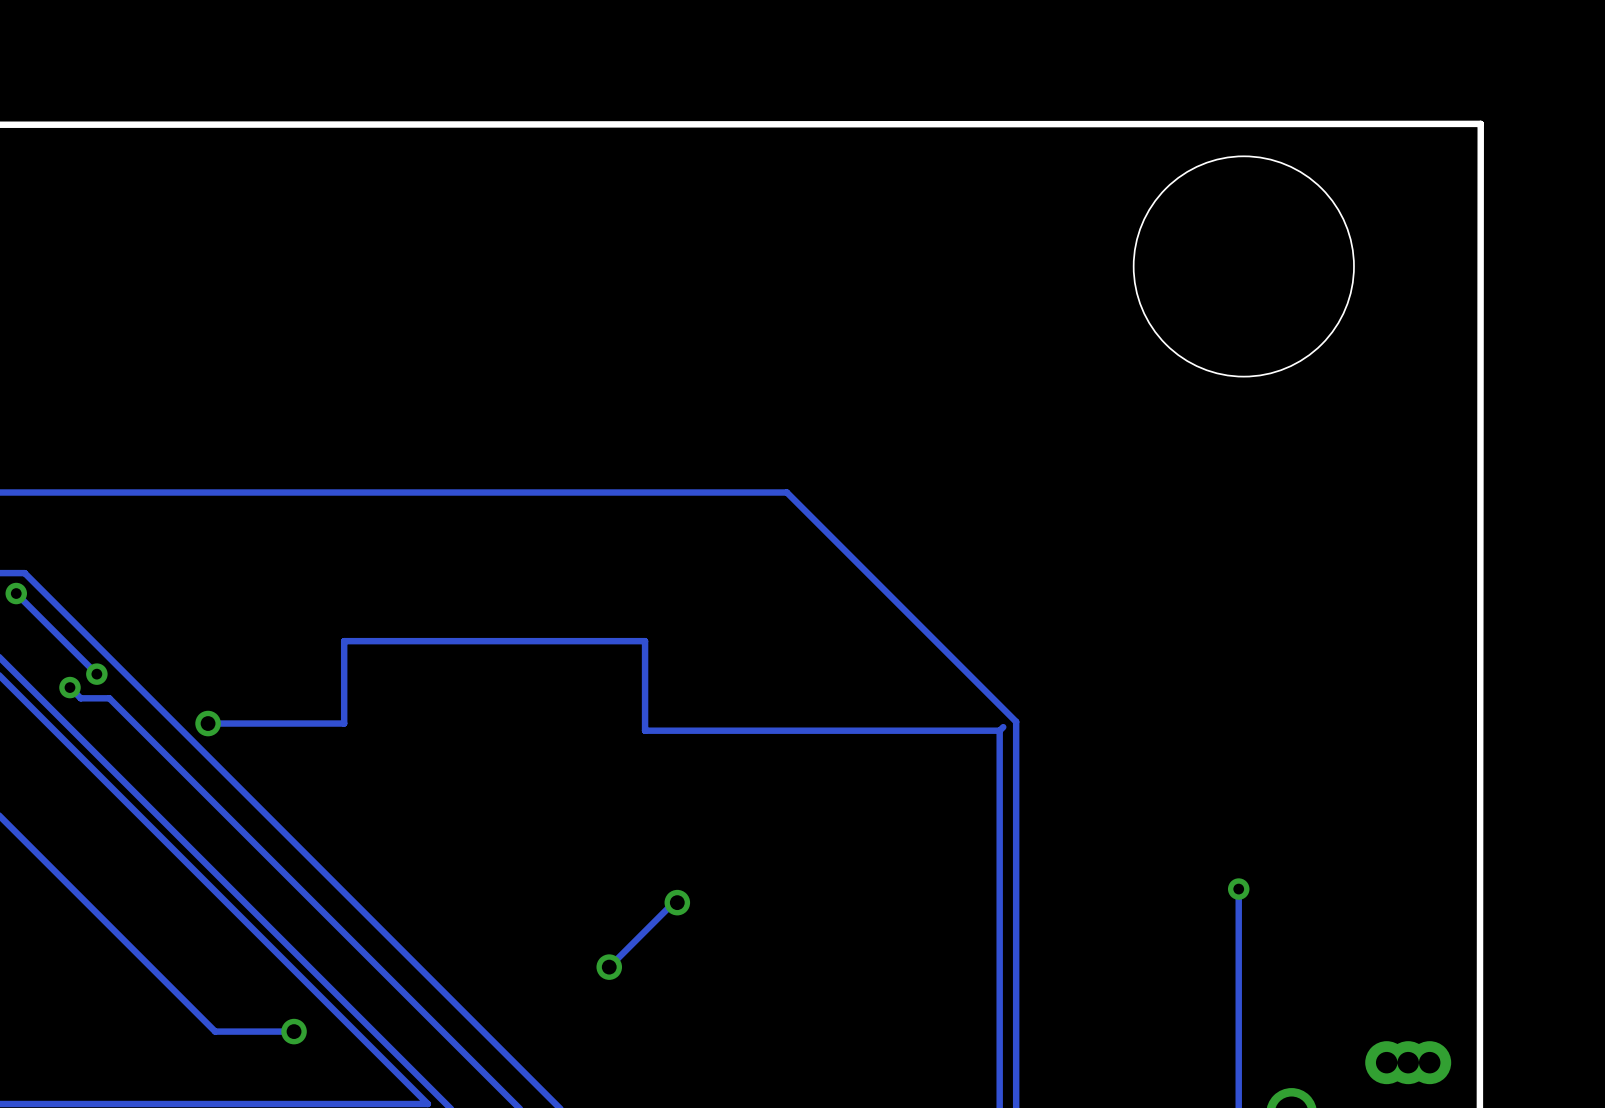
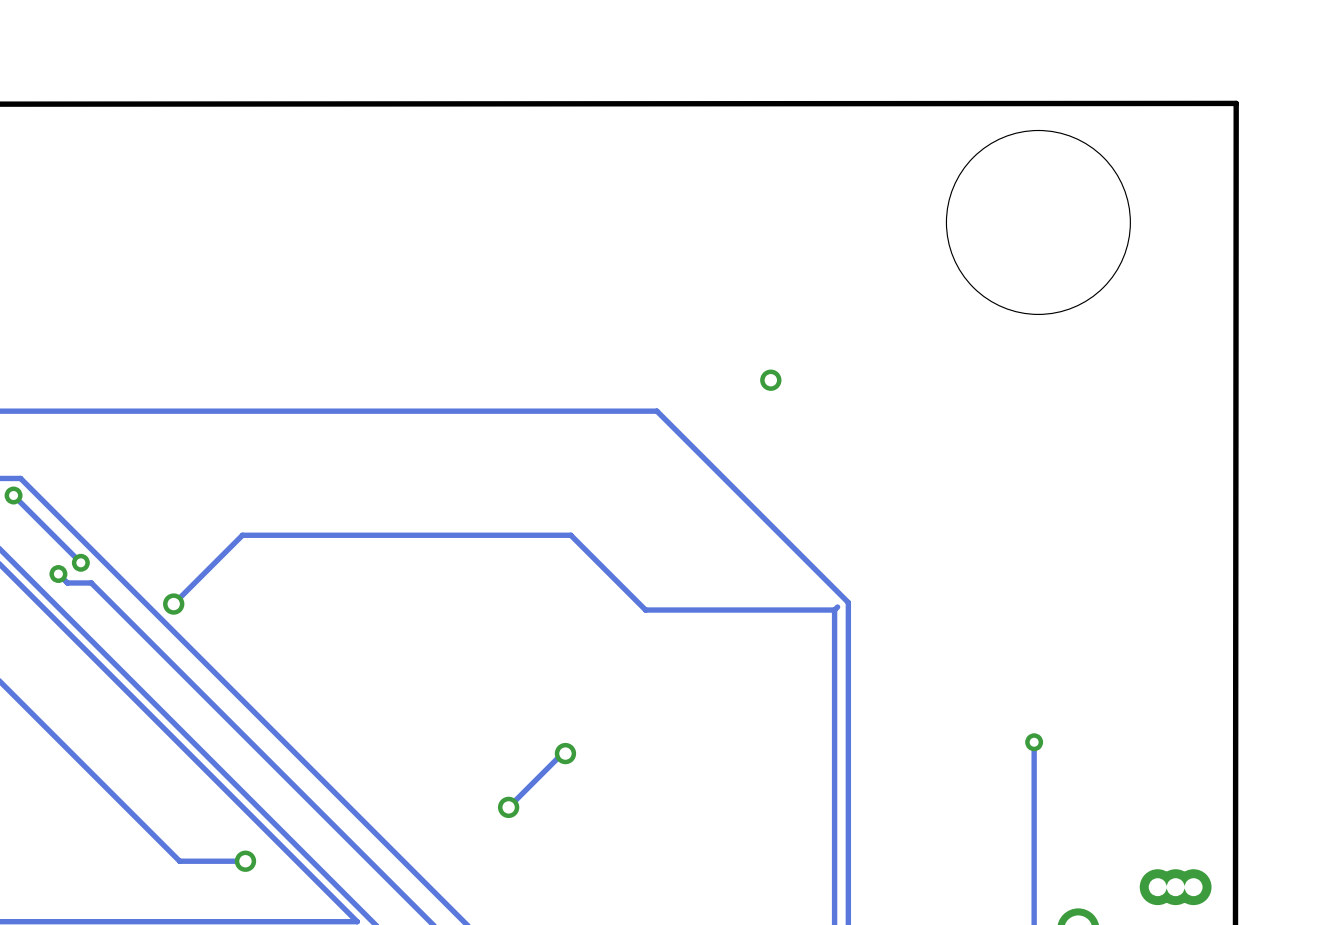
via: none -> (770, 380)
track: (344, 641) (344, 723) (208, 723) -> (287, 535) (242, 535) (173, 604)
track: (645, 641) (645, 730) (773, 730) -> (538, 535) (570, 535) (645, 610)

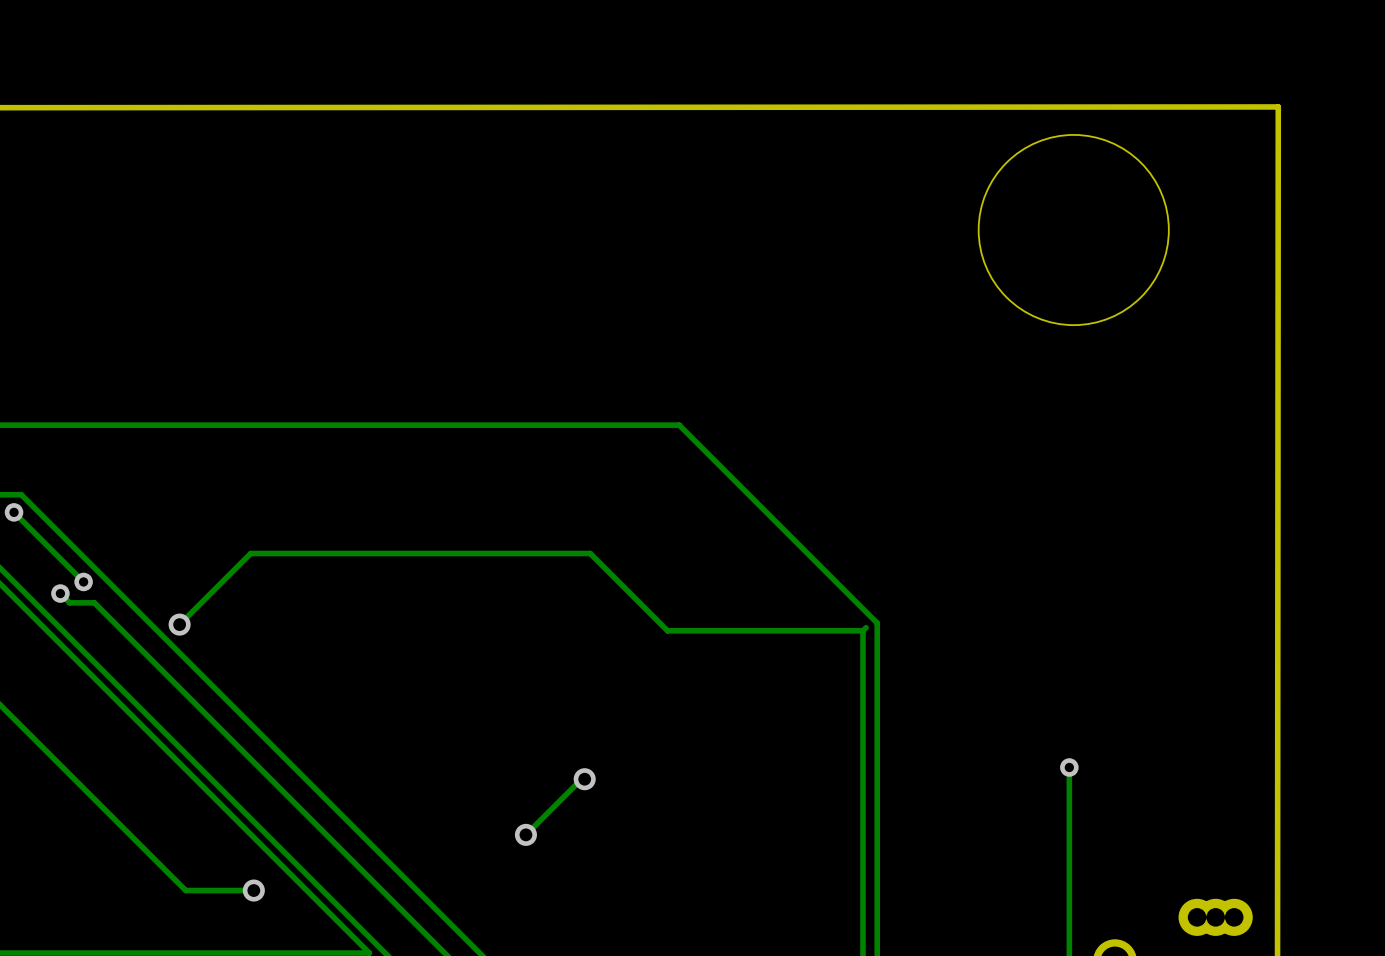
via: (770, 380) -> none

